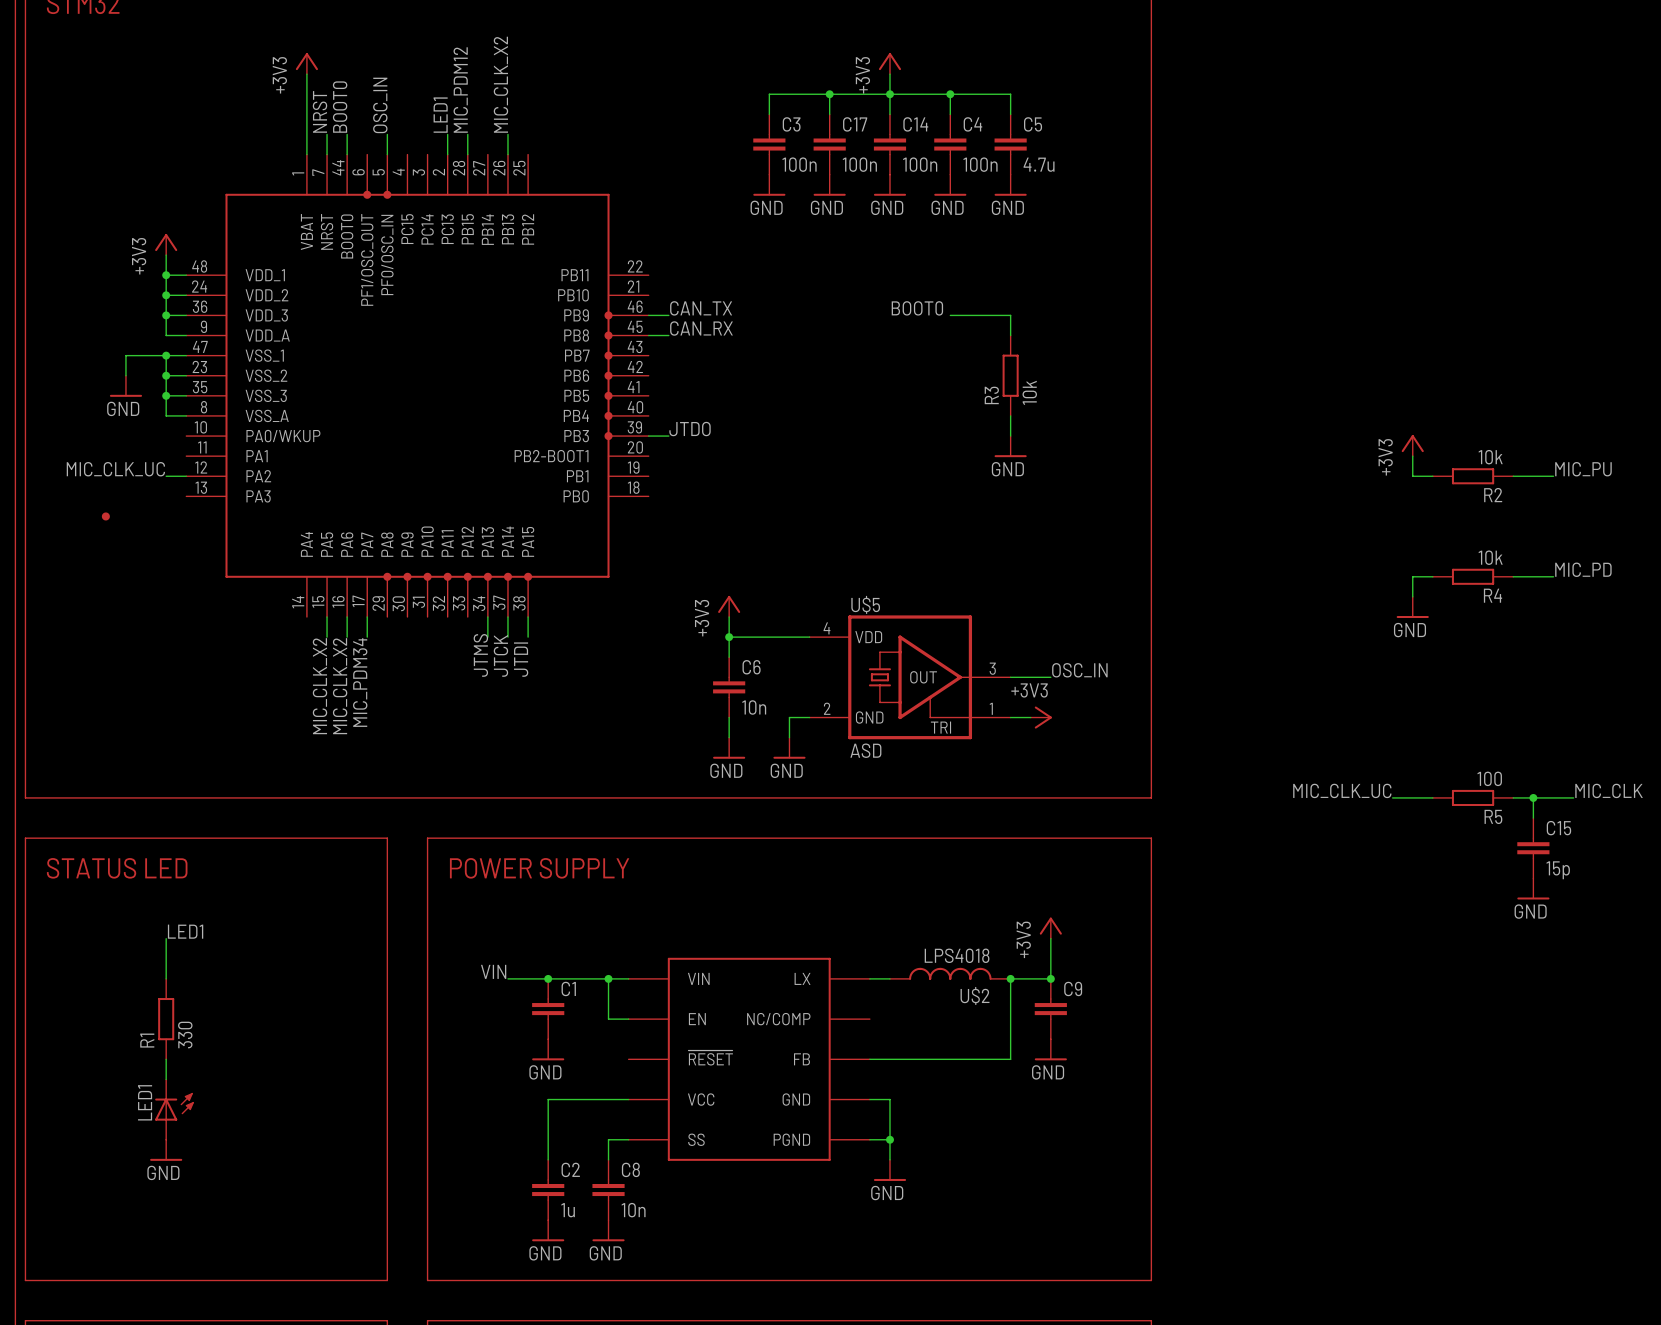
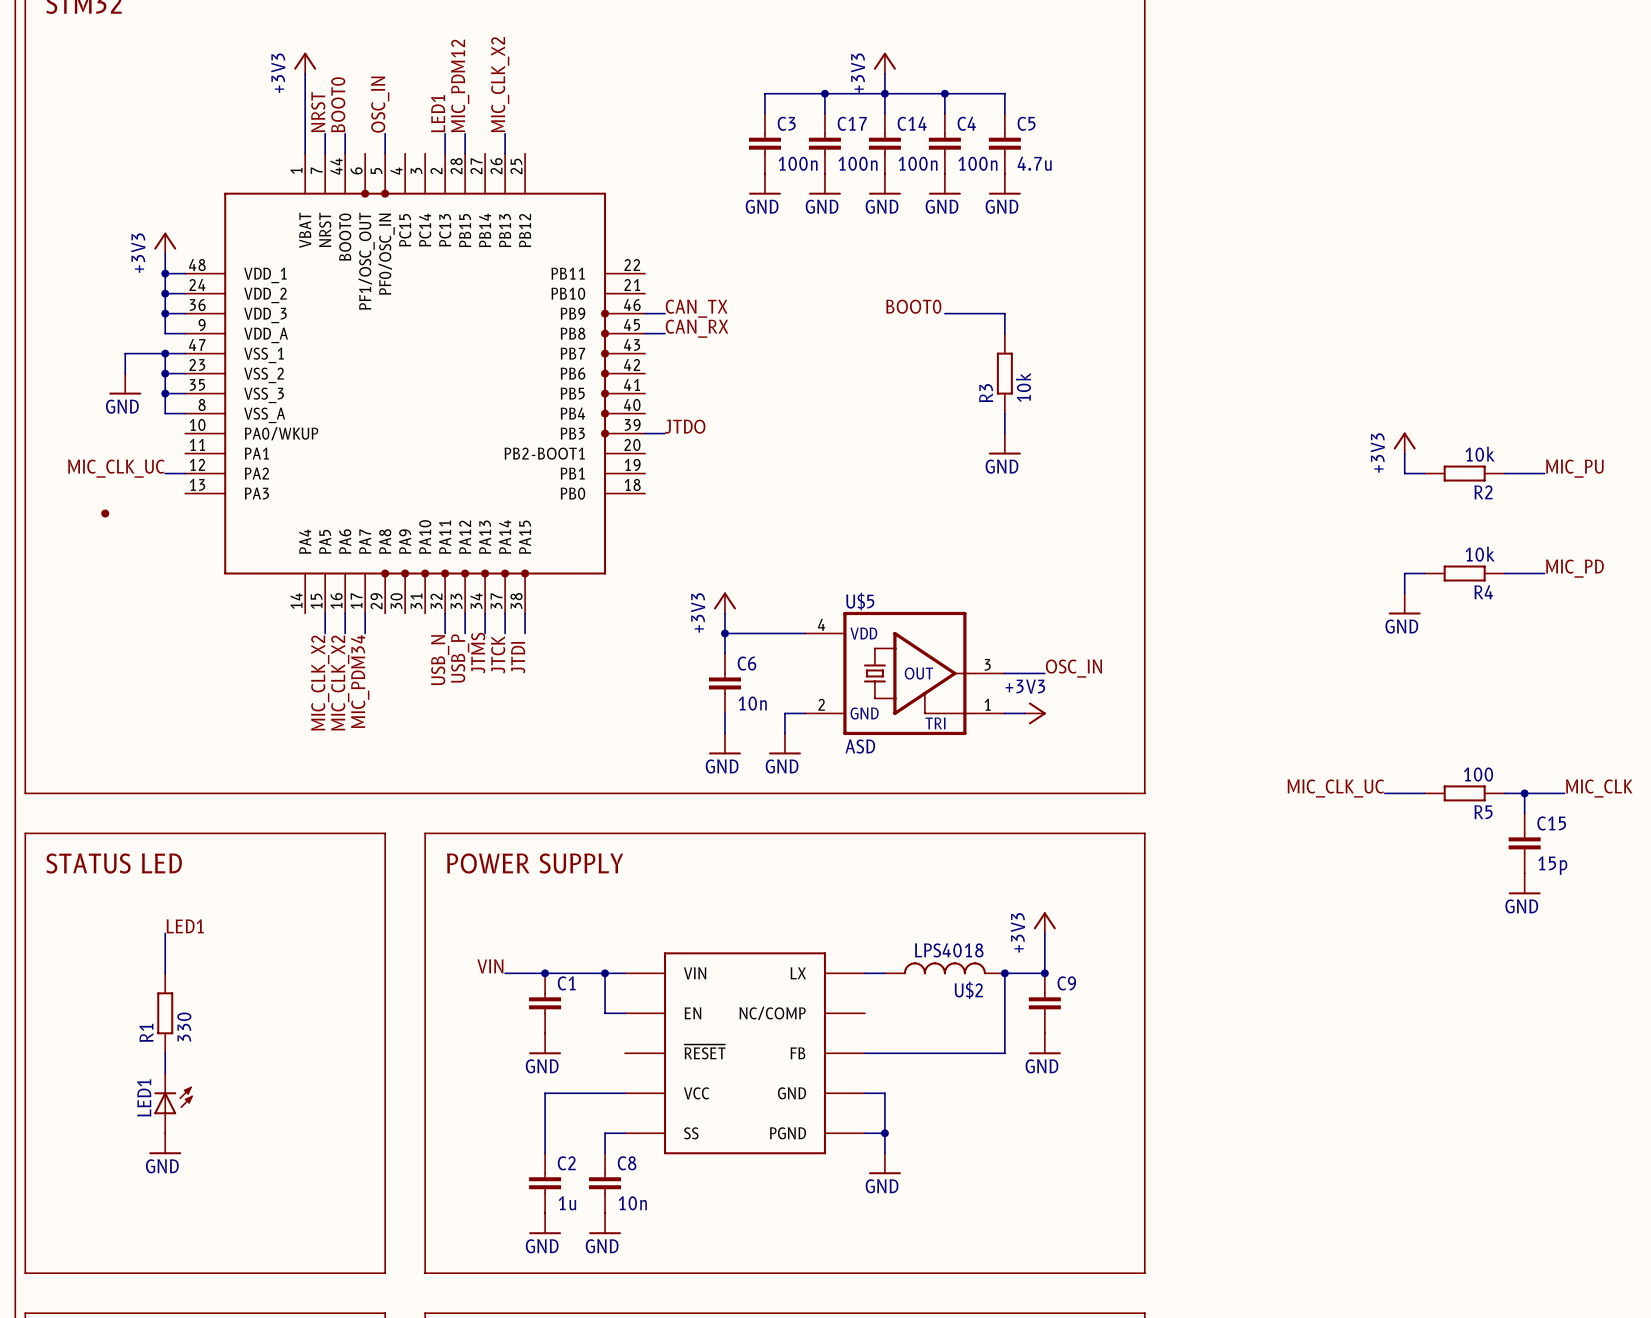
wire: none -> (445, 613) (445, 633)
wire: none -> (465, 613) (465, 633)
label: none -> USB_P (460, 658)
label: none -> USB_N (440, 660)

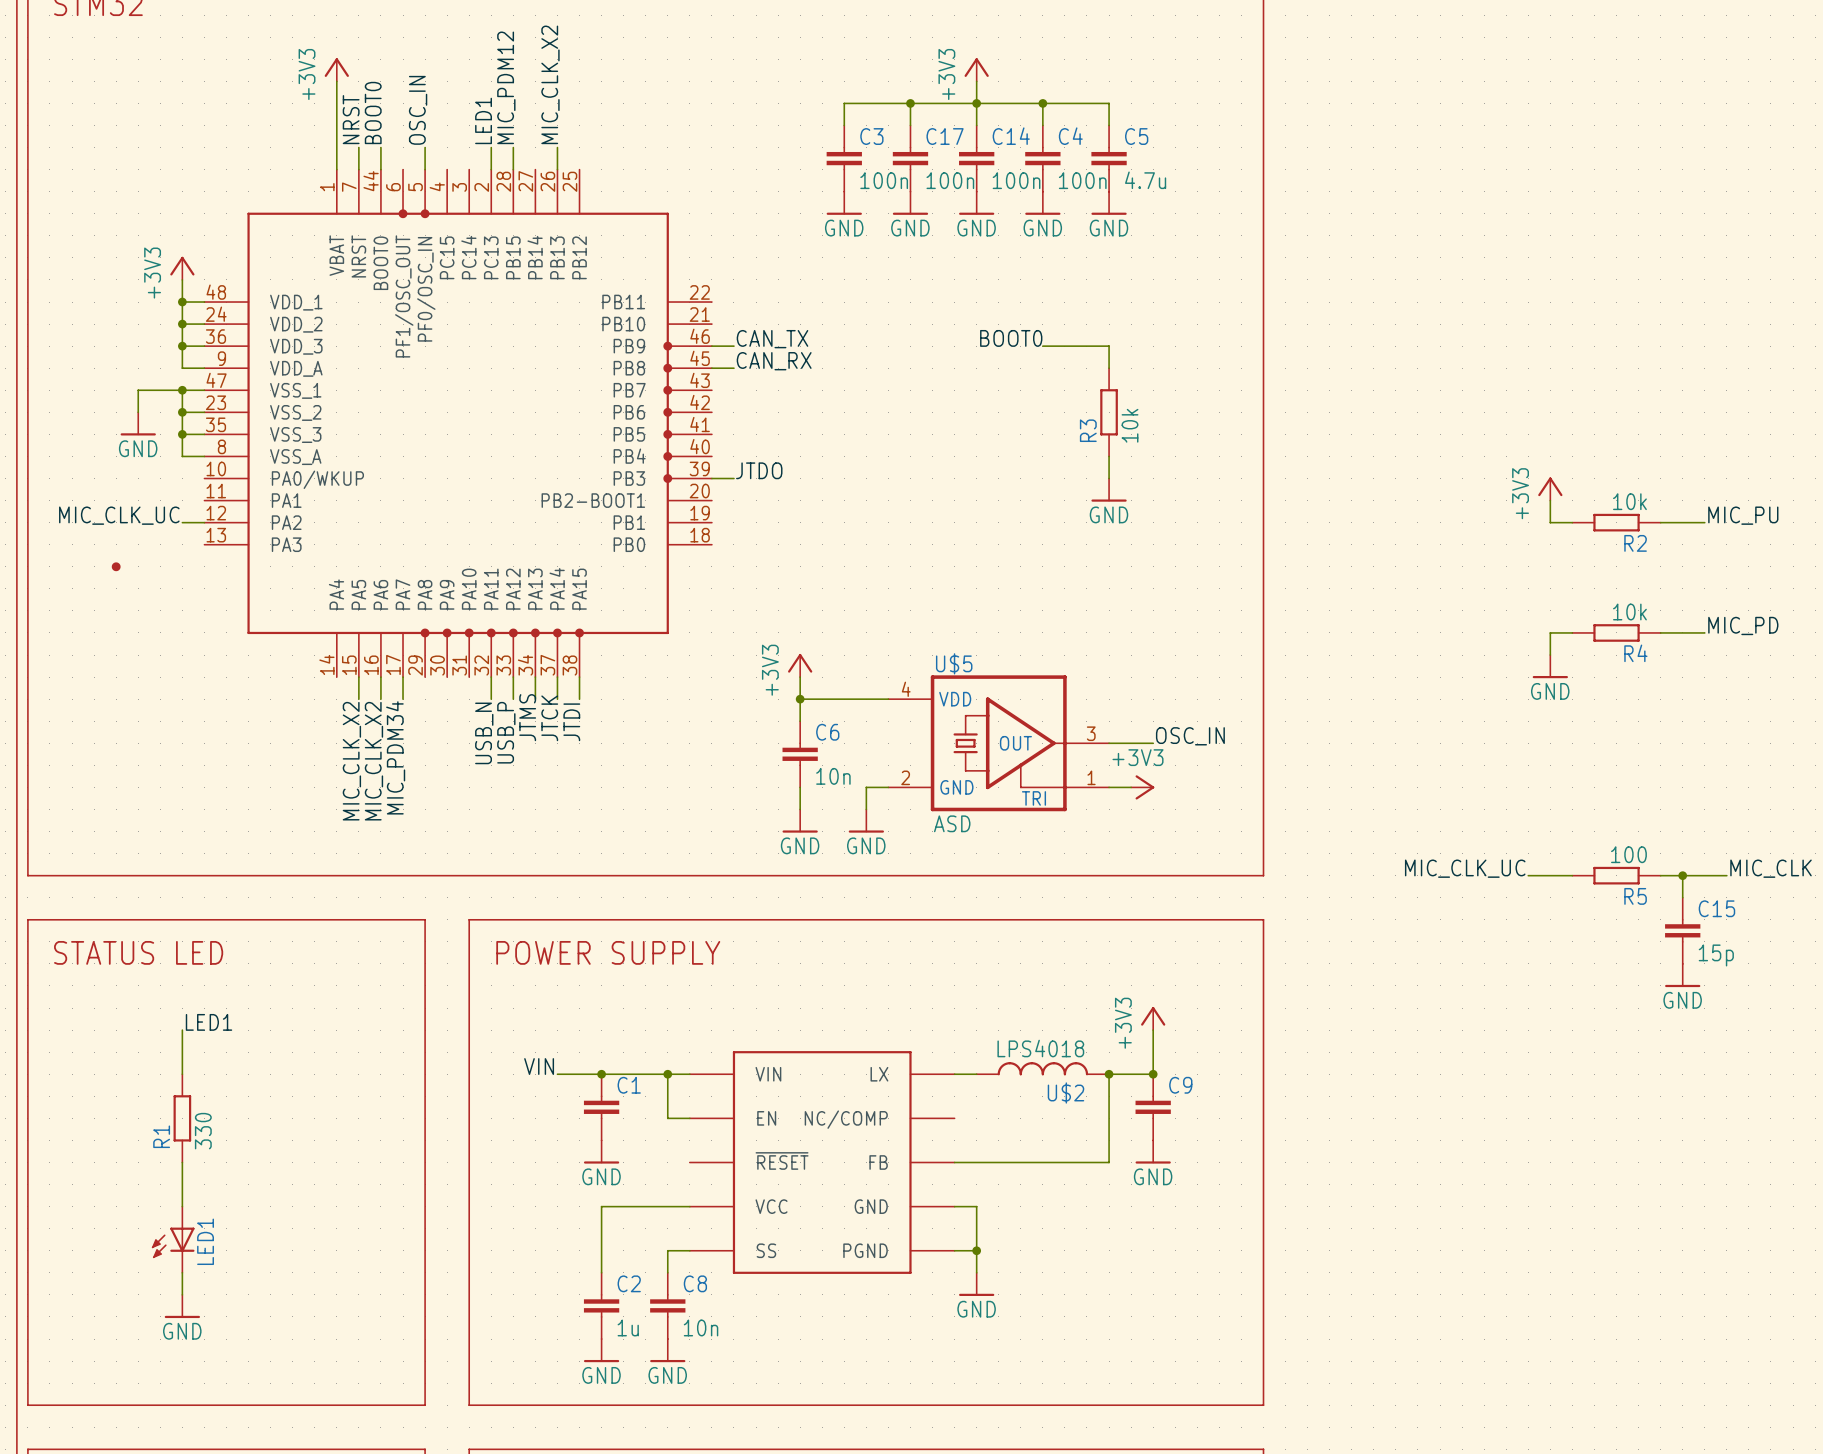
LED1 rotation: 0° (173, 1100) -> 180° (173, 1242)
power symbol position: GND (165, 1143) -> GND (182, 1306)
wire: none -> (182, 1272) (182, 1294)

